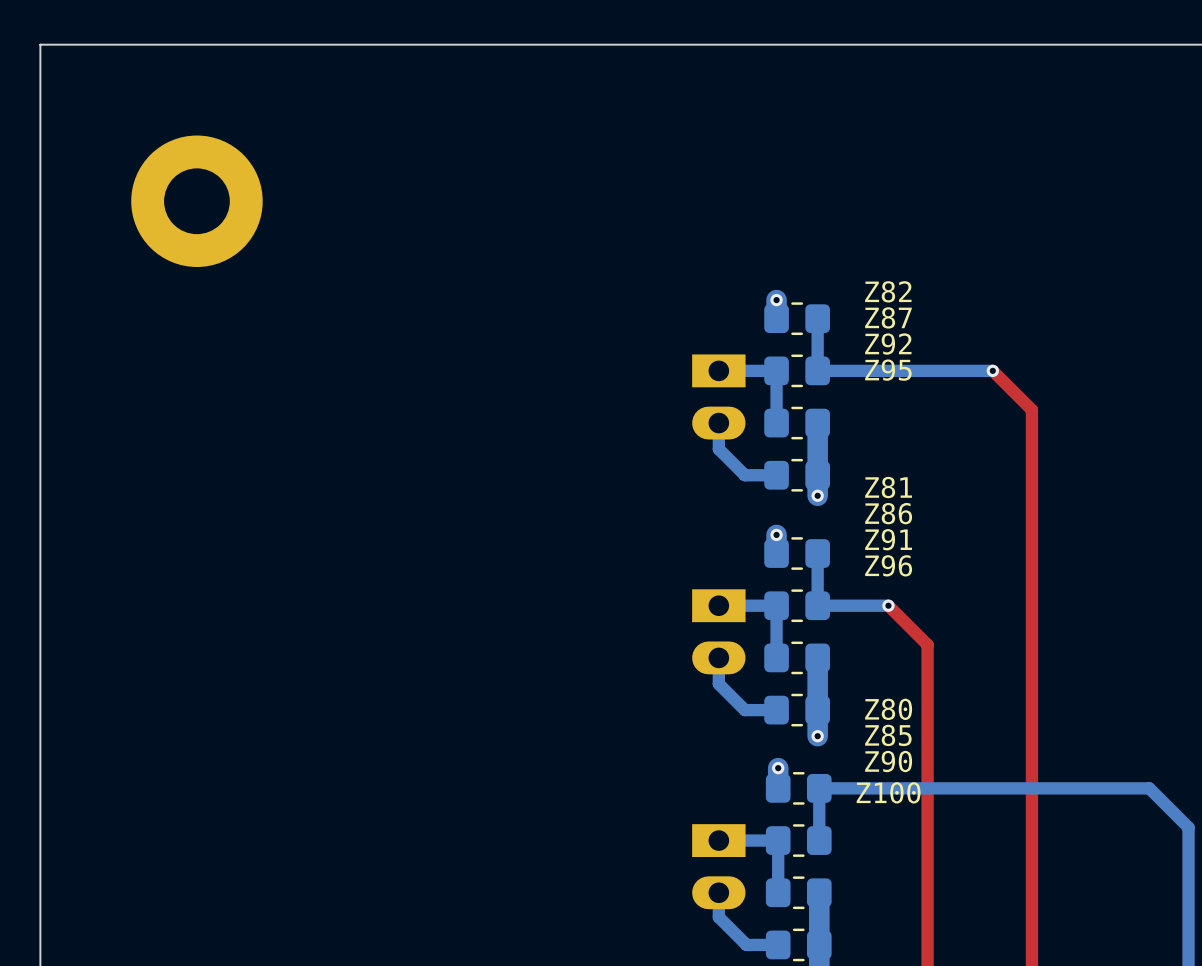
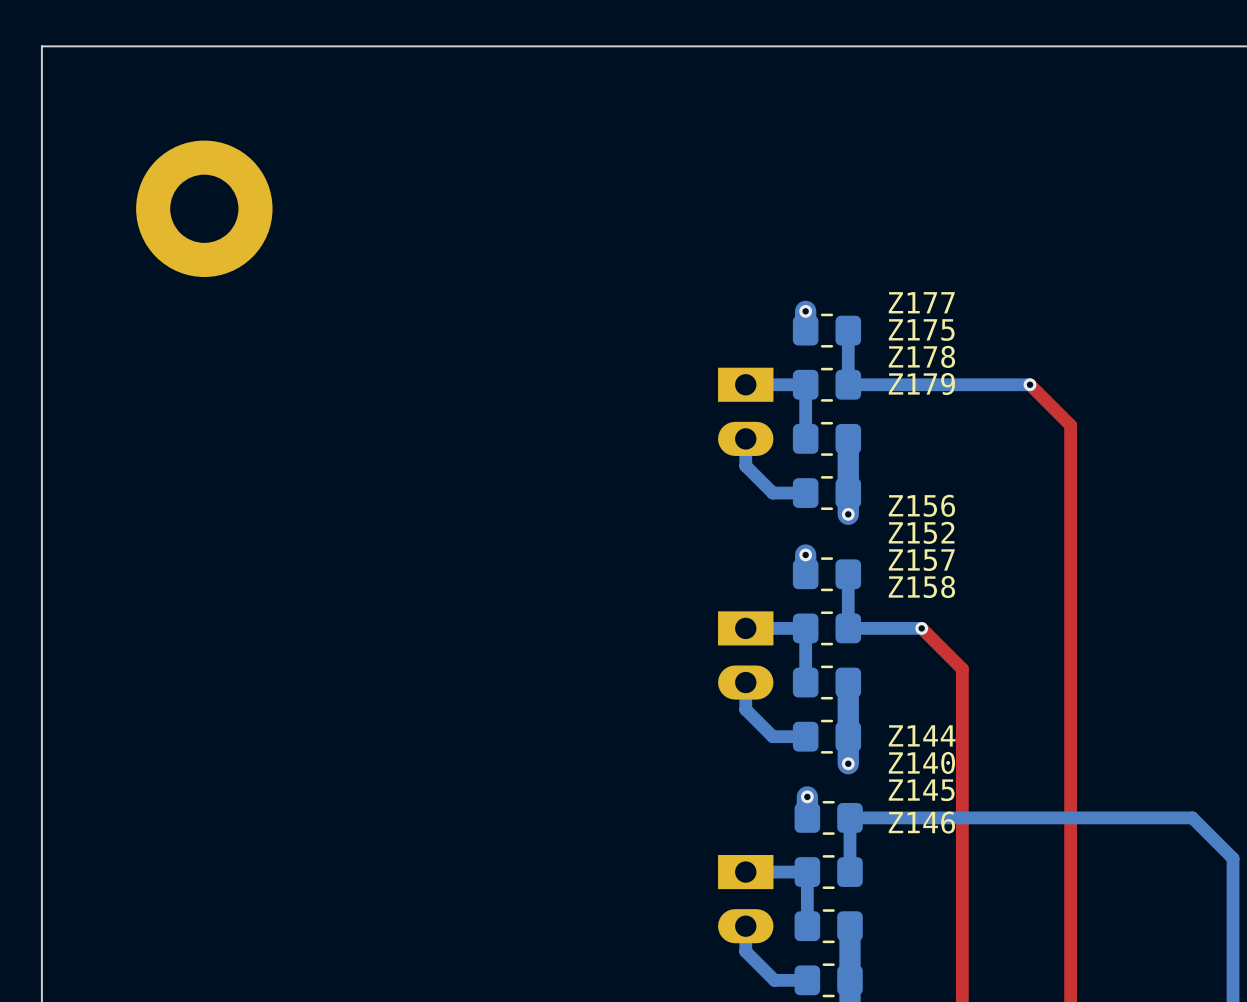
Z82 name: Z82 (888, 291) -> Z177 (921, 302)
Z87 name: Z87 (888, 317) -> Z175 (921, 330)
Z92 name: Z92 (888, 344) -> Z178 (921, 356)
Z95 name: Z95 (888, 370) -> Z179 (921, 383)
Z81 name: Z81 (888, 487) -> Z156 (921, 505)
Z86 name: Z86 (888, 513) -> Z152 (921, 532)
Z91 name: Z91 (888, 539) -> Z157 (921, 560)
Z96 name: Z96 (888, 565) -> Z158 (921, 587)
Z80 name: Z80 (888, 709) -> Z144 (922, 735)
Z85 name: Z85 (888, 735) -> Z140 (921, 762)
Z90 name: Z90 (888, 761) -> Z145 (921, 790)
Z100 name: Z100 (888, 792) -> Z146 (921, 822)

